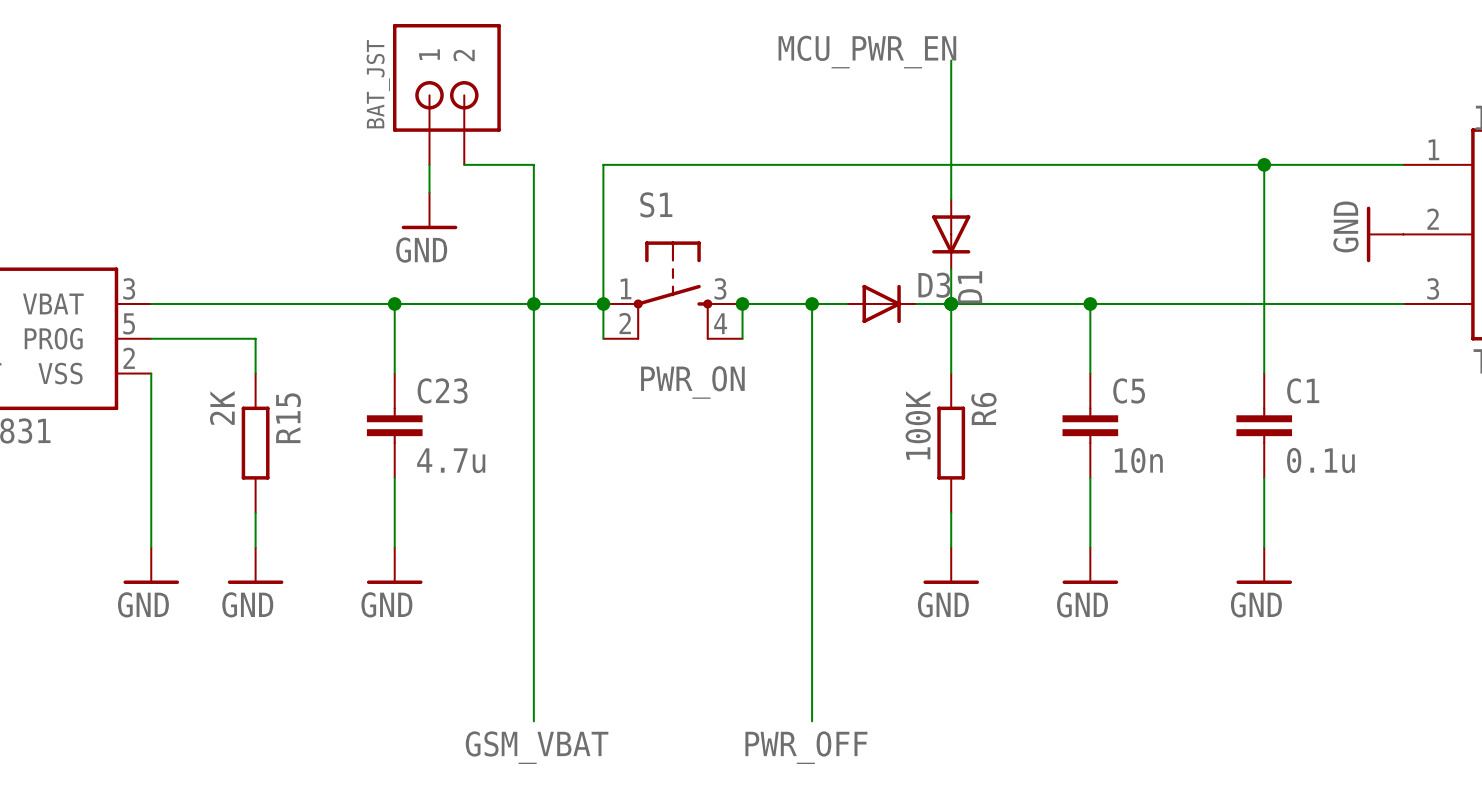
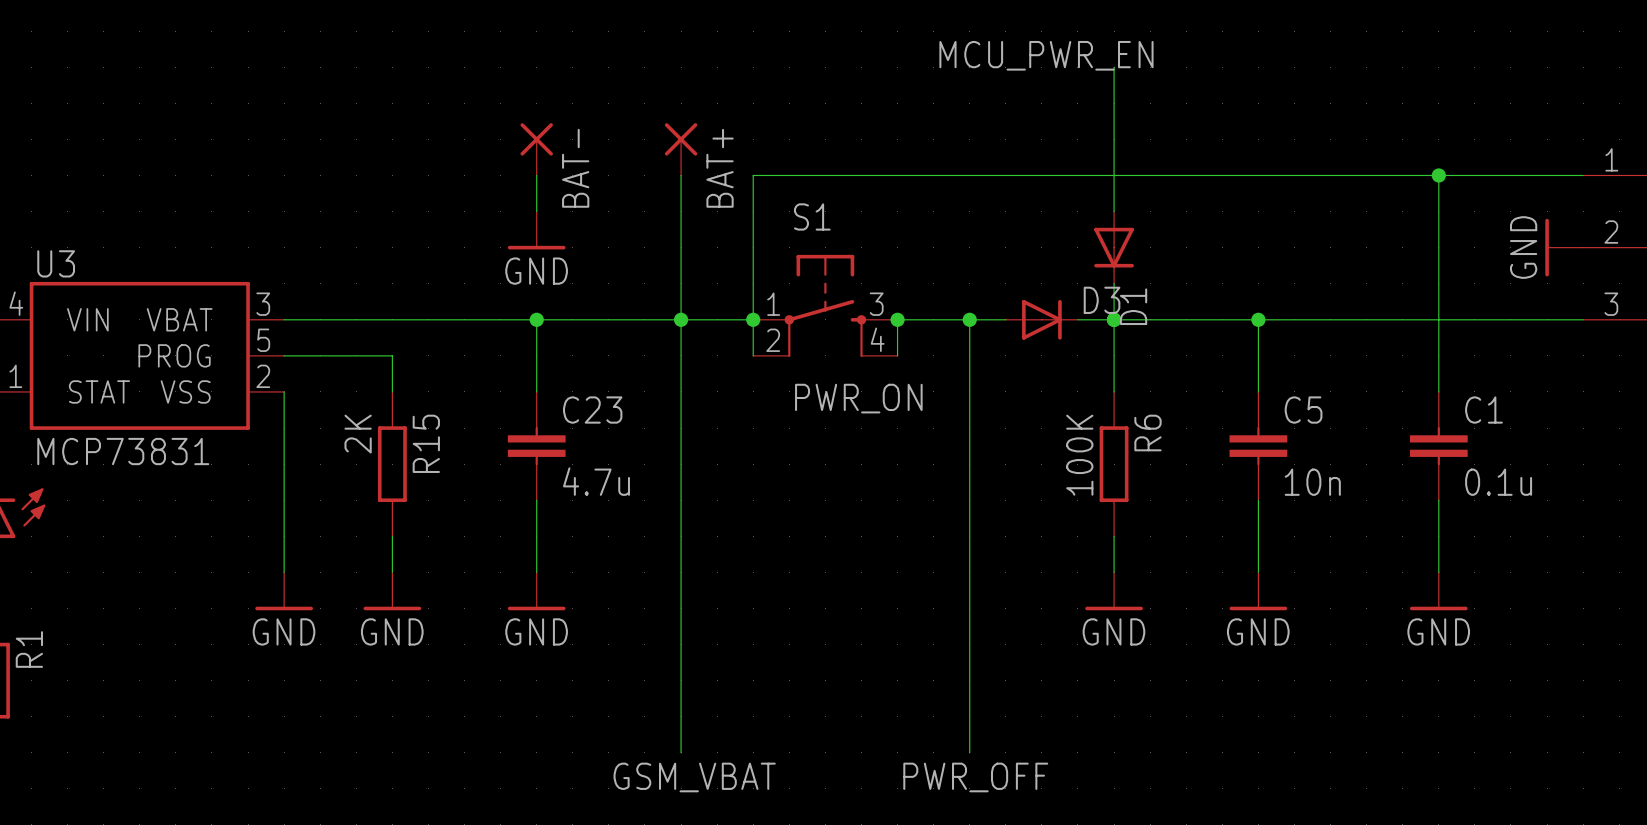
BAT_JST: (446, 94) -> none
BAT-: none -> (536, 149)
BAT+: none -> (681, 149)
wire: none -> (536, 175) (536, 211)
wire: (429, 164) (429, 192) -> none
wire: (464, 164) (533, 164) -> none
power symbol position: GND (429, 210) -> GND (536, 230)

